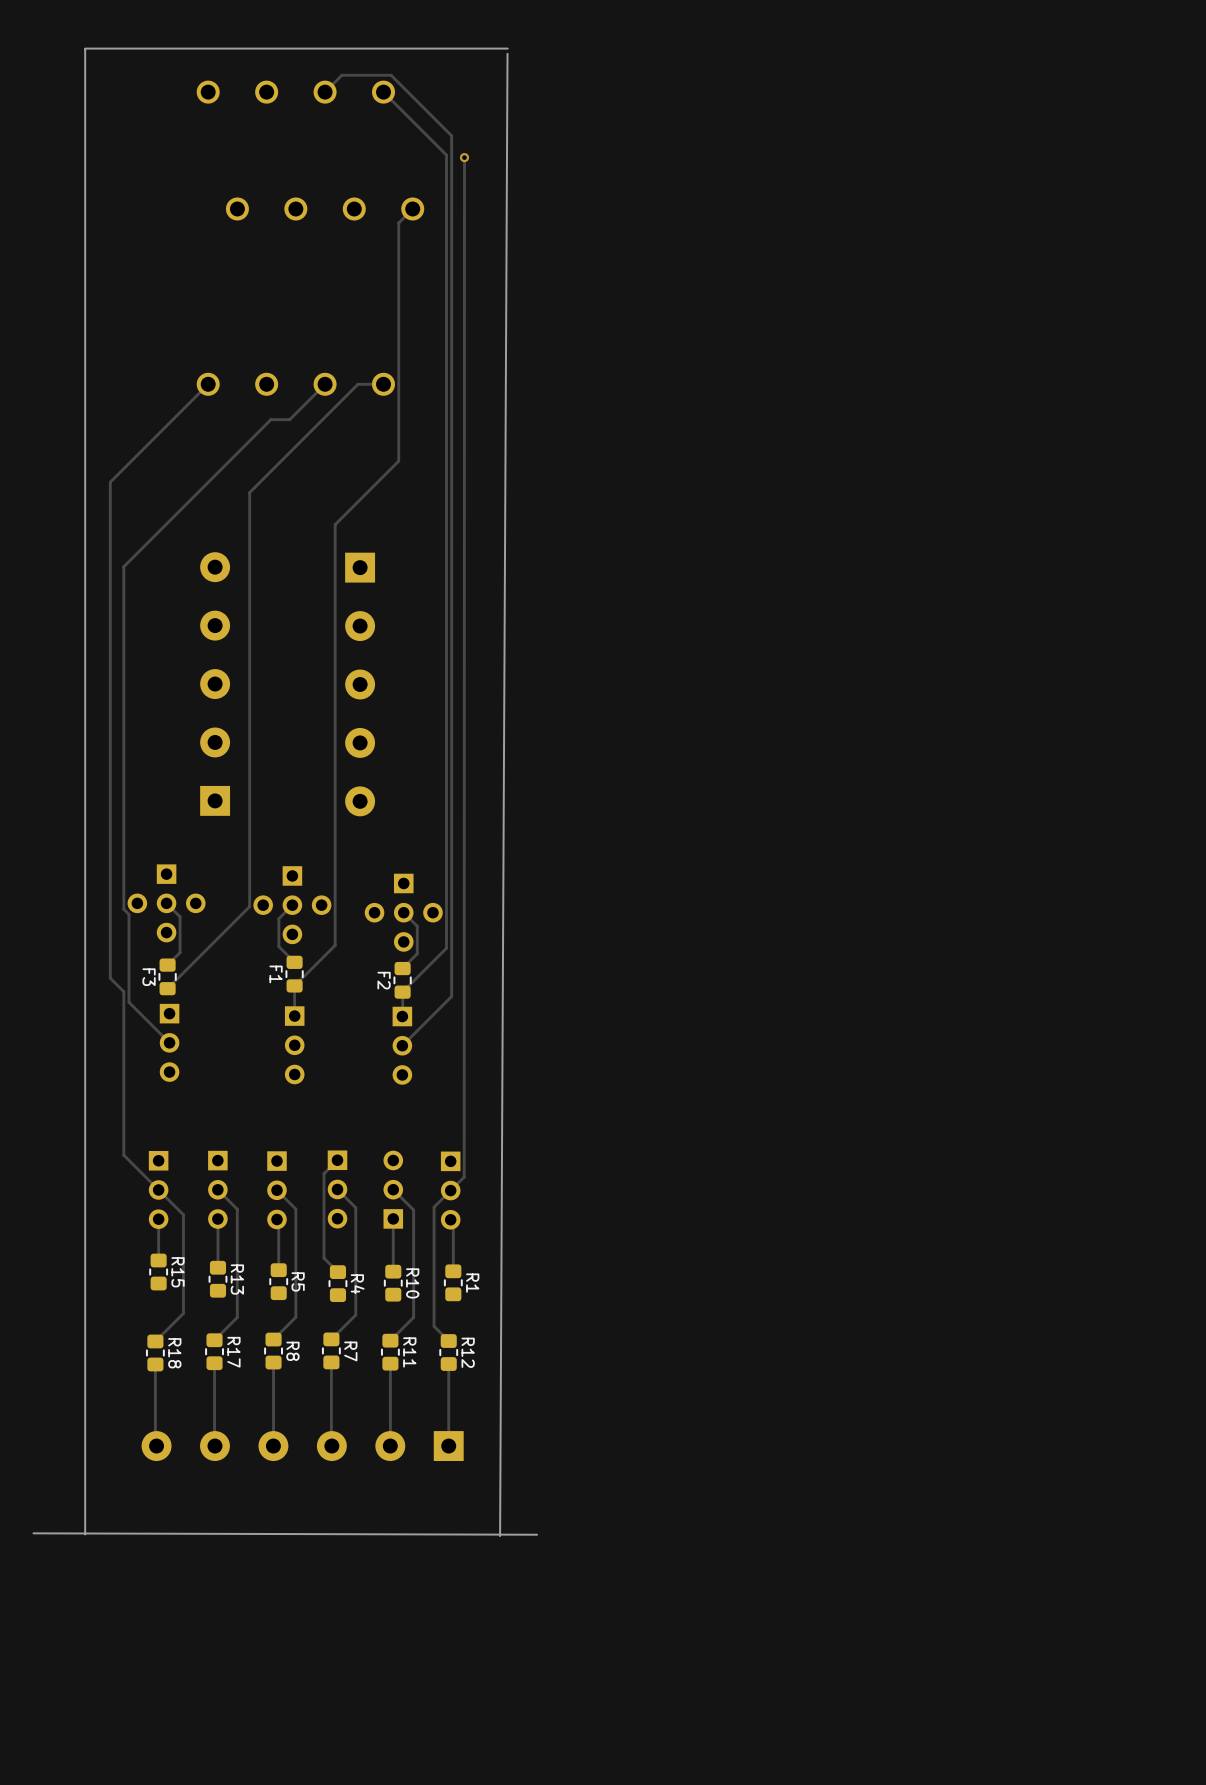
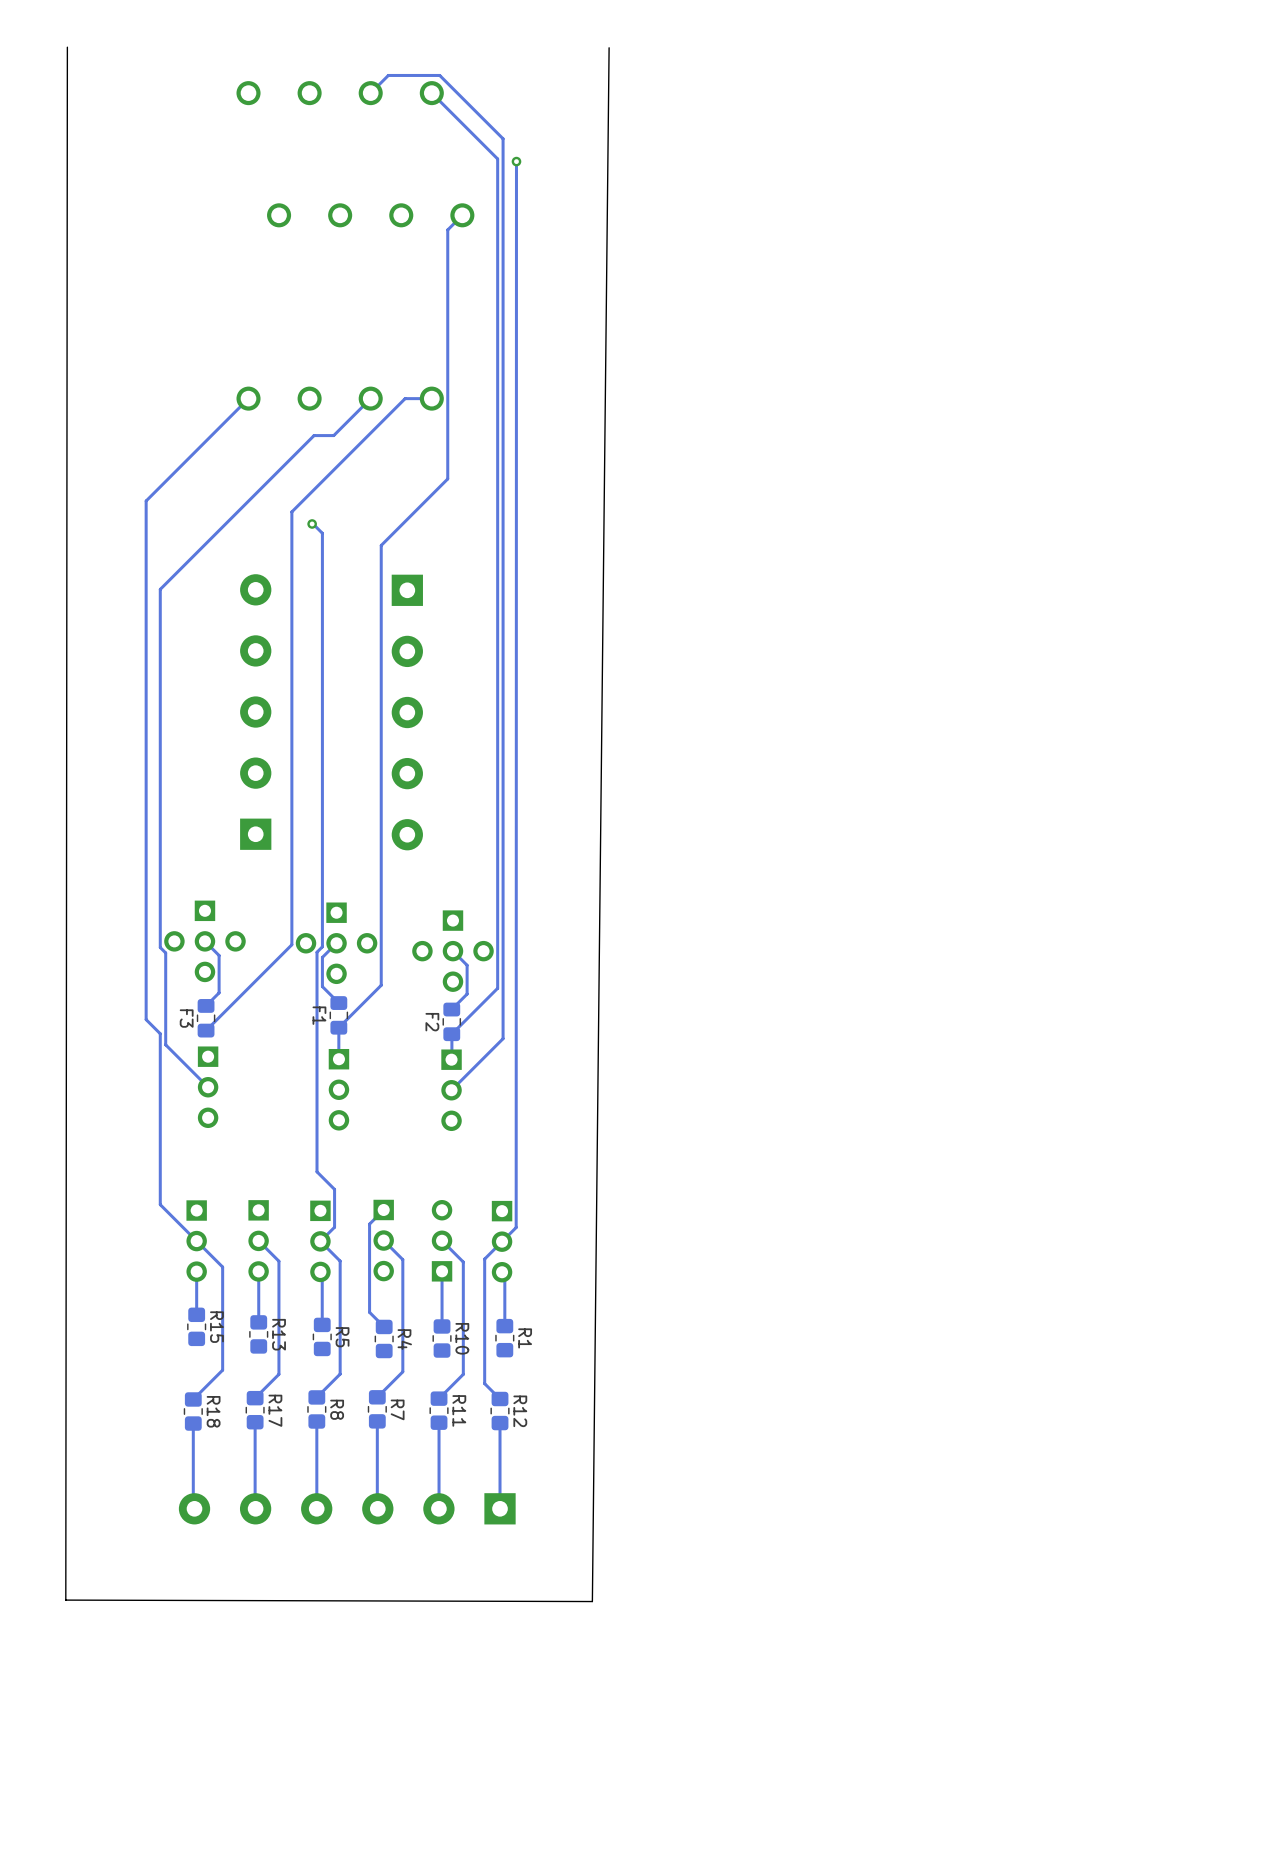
board edge: none -> (67, 47) (65, 1600)
board edge: (507, 48) (85, 48) -> none
board edge: none -> (609, 47) (592, 1601)
board edge: (85, 49) (85, 1534) -> none
board edge: (507, 53) (500, 1536) -> none
track: none -> (313, 523) (322, 533) (322, 946) (317, 952) (317, 1171) (334, 1189) (334, 1227) (320, 1241)
via: none -> (312, 523)

